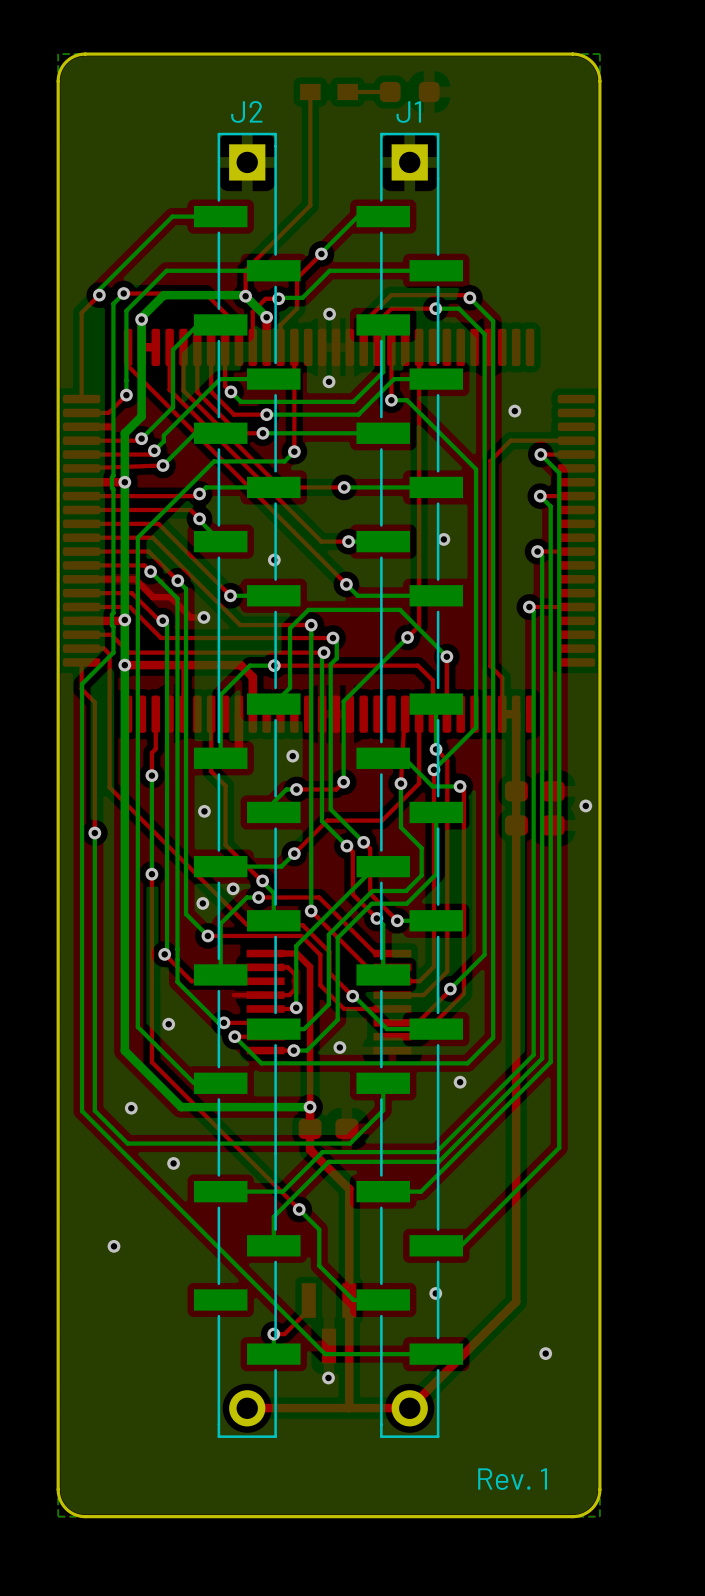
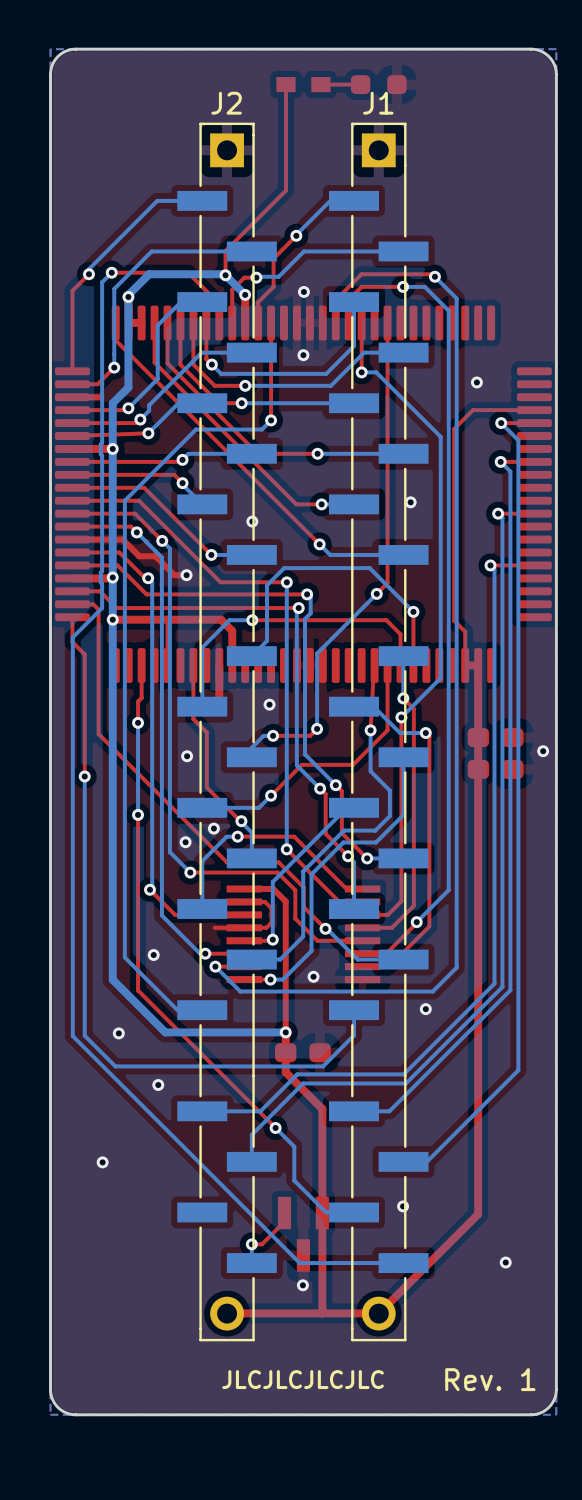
text: none -> JLCJLCJLCJLC (303, 1379)

